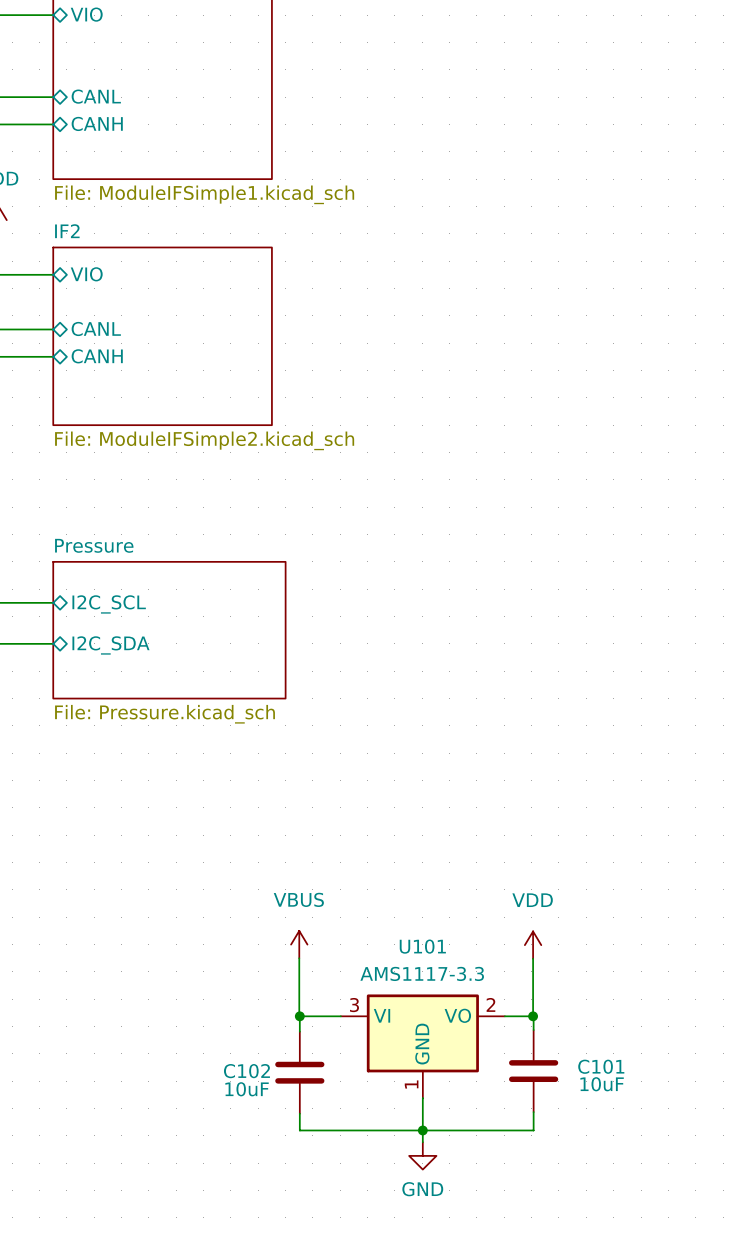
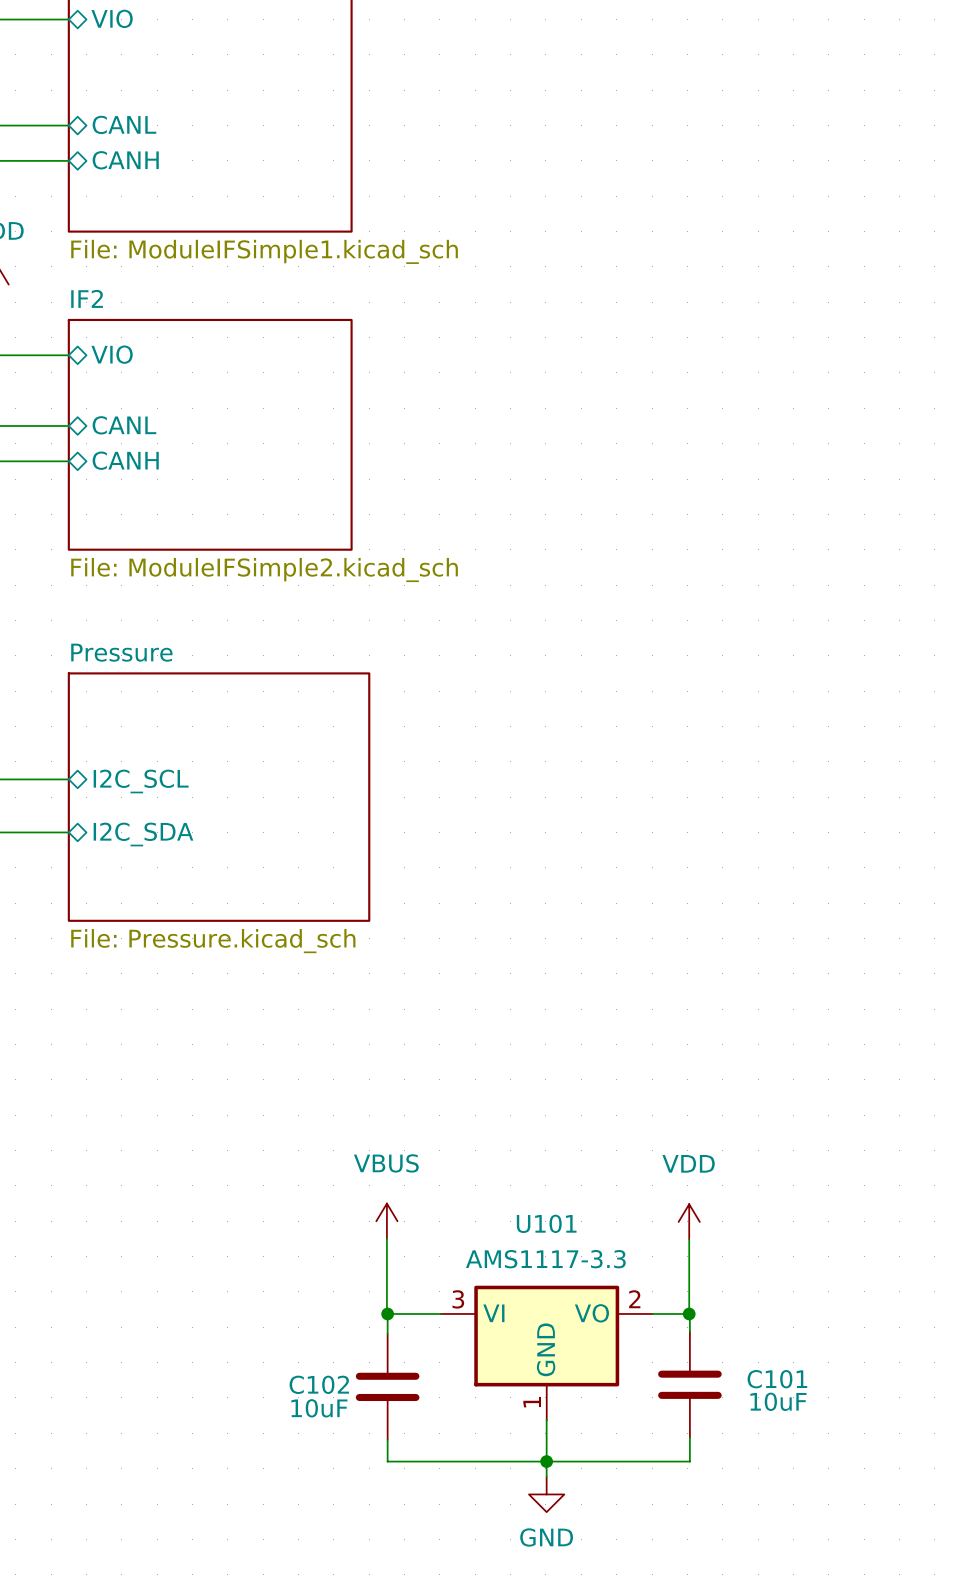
sheet Pressure: none -> File: Pressure.kicad_sch (219, 797)
sheet Pressure: File: Pressure.kicad_sch (169, 630) -> none

